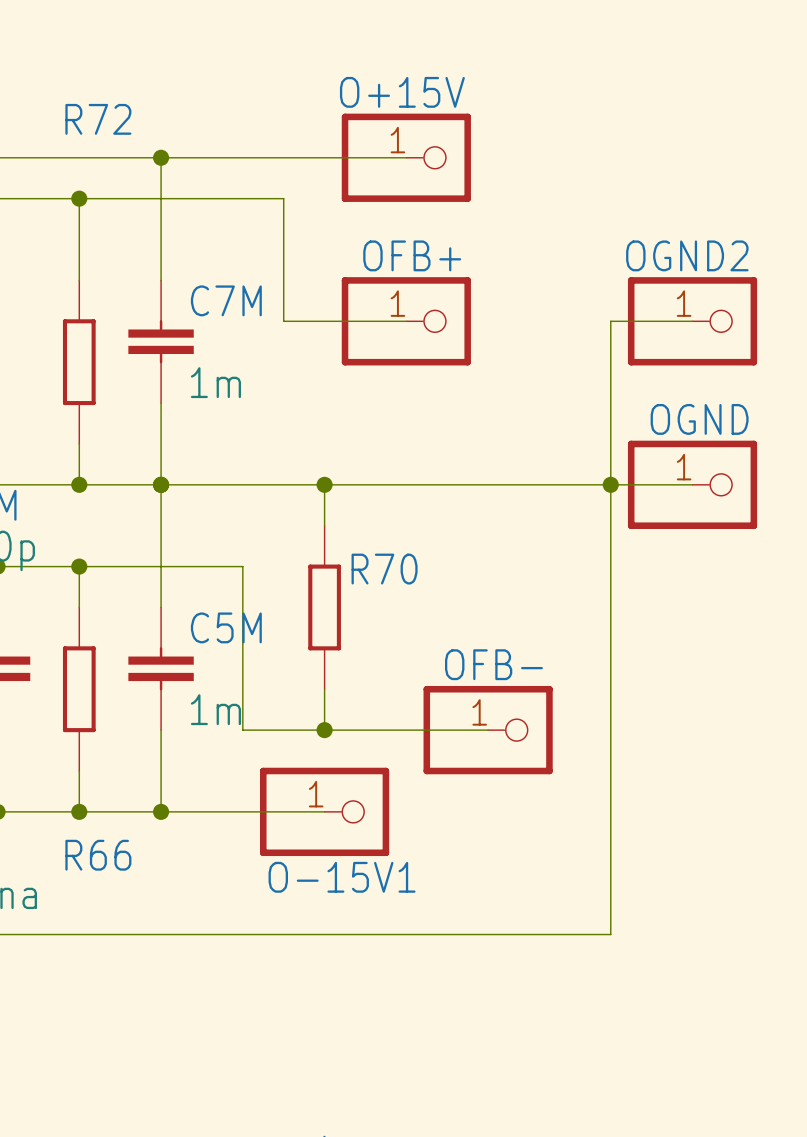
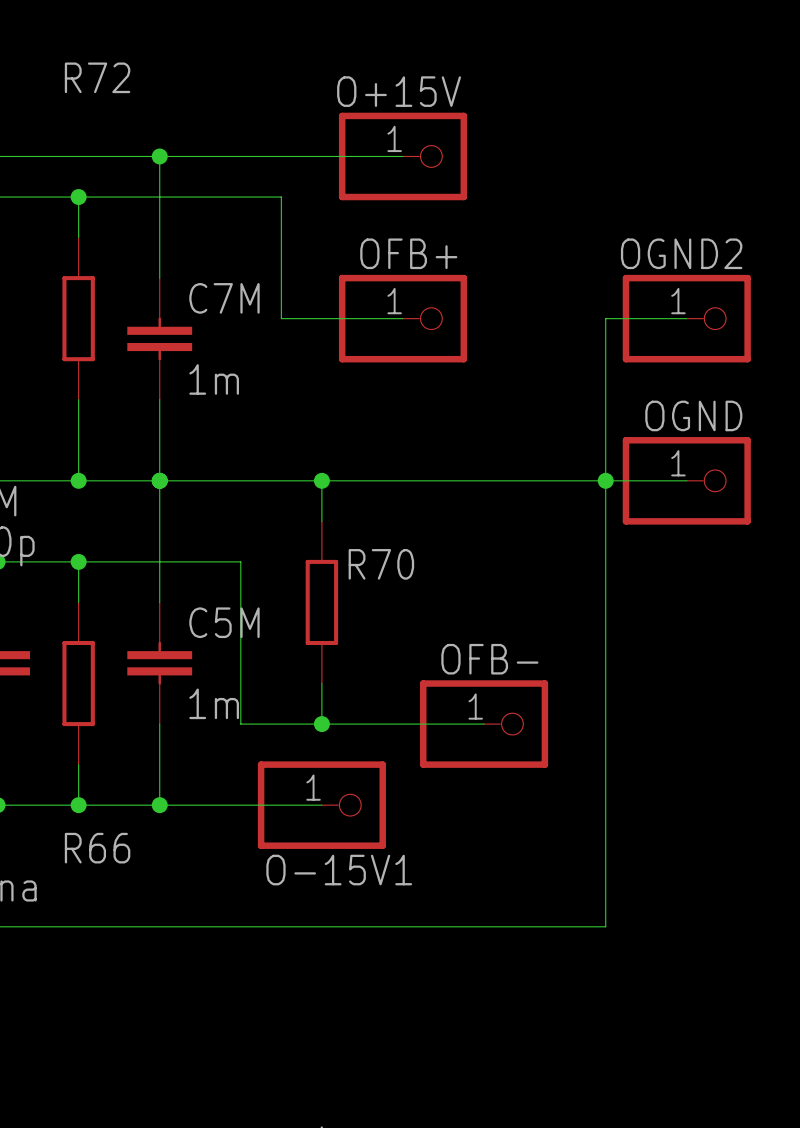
R72 position: (79, 362) -> (78, 318)

